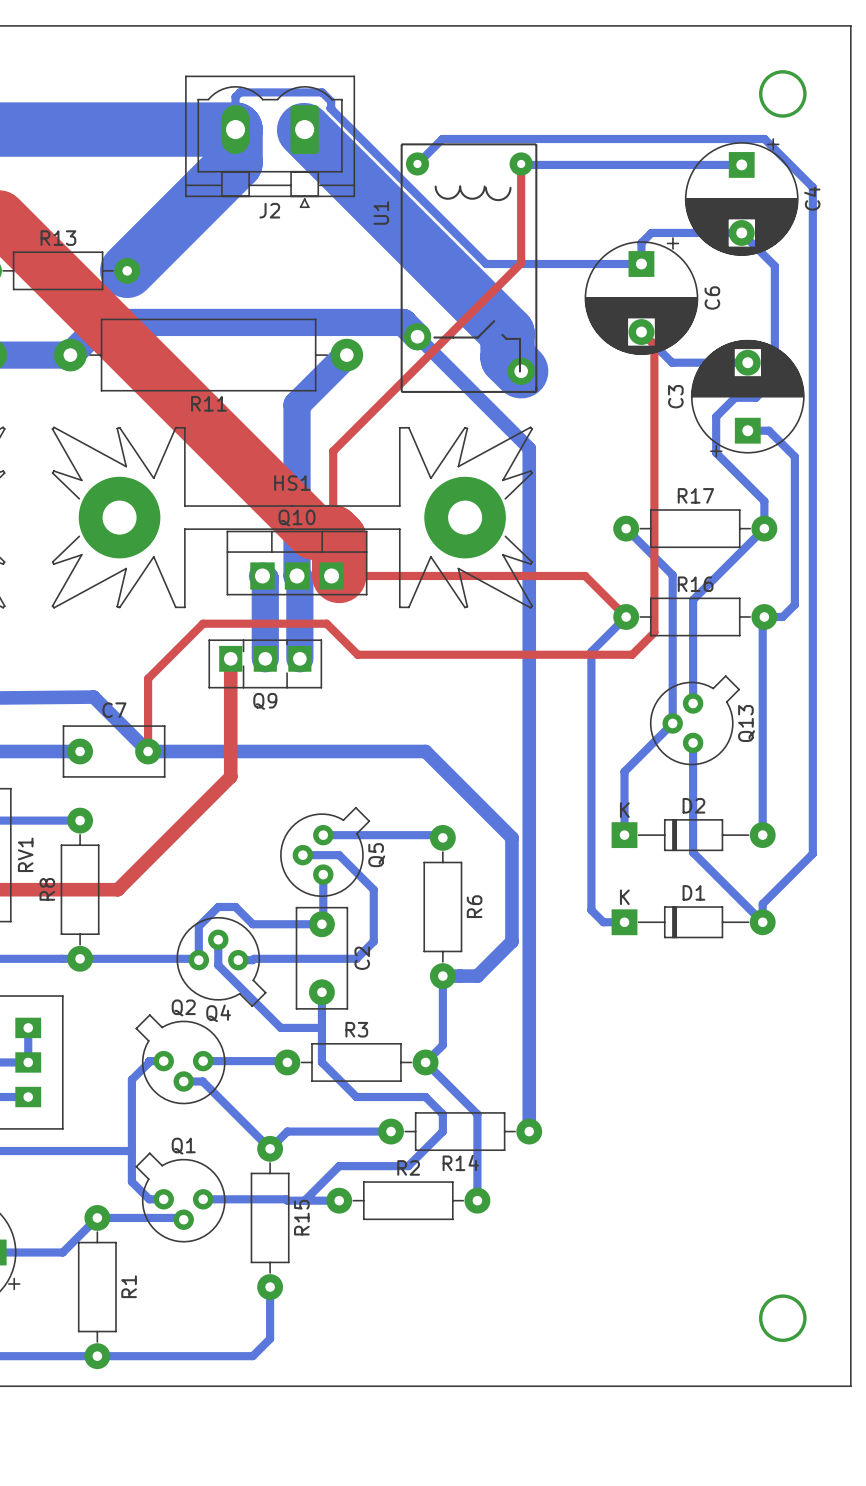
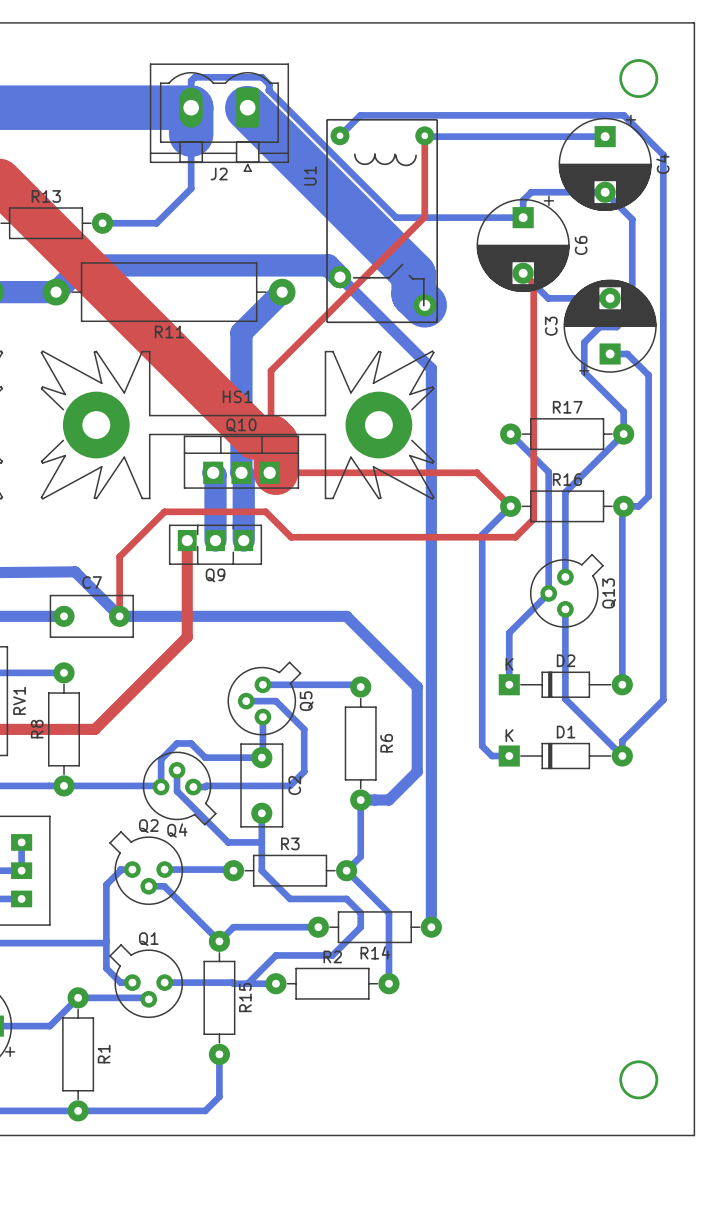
bottom track: (235, 162) (127, 270) -> (191, 134) (191, 188) (156, 223) (102, 223)

